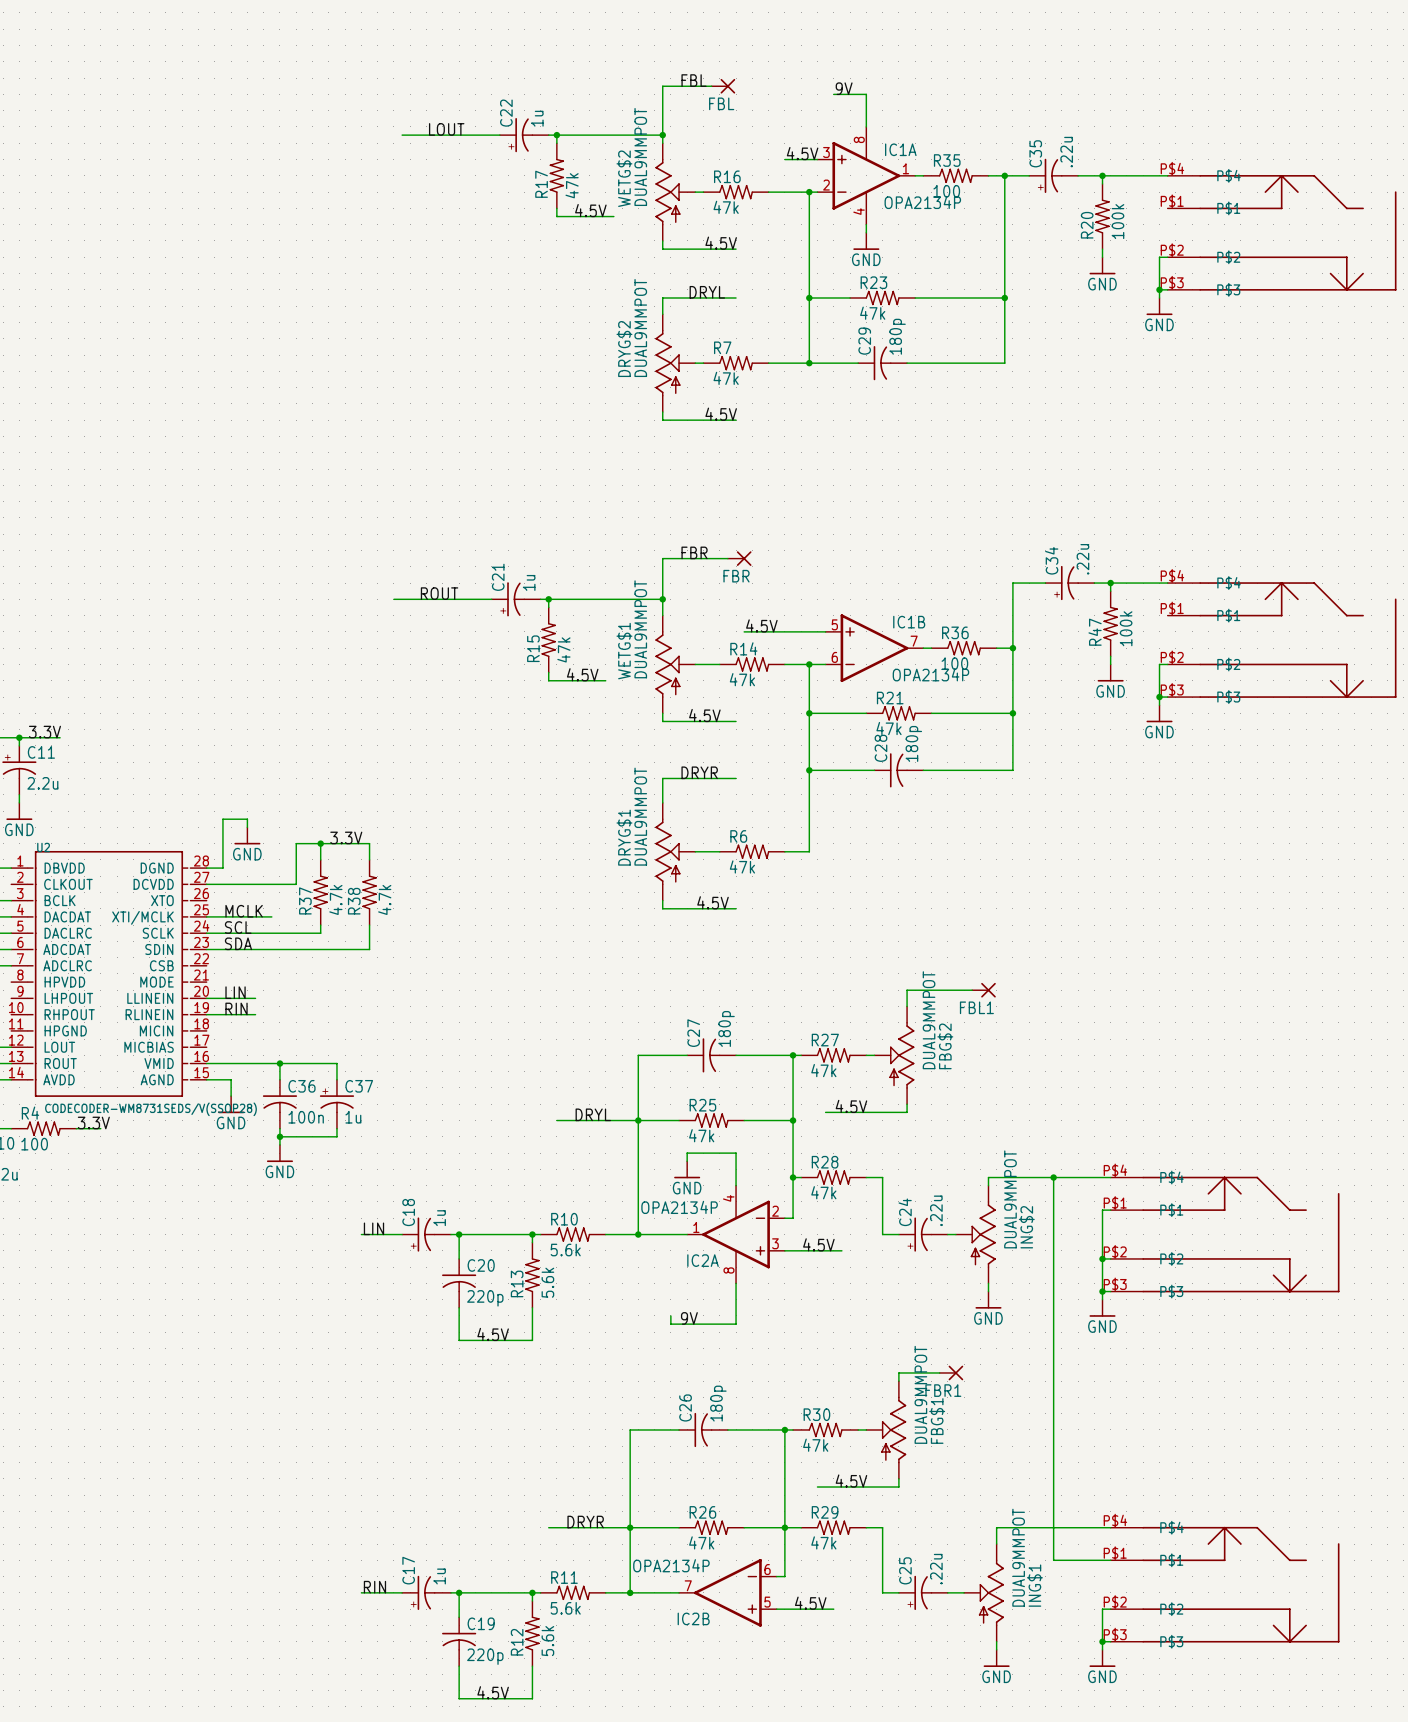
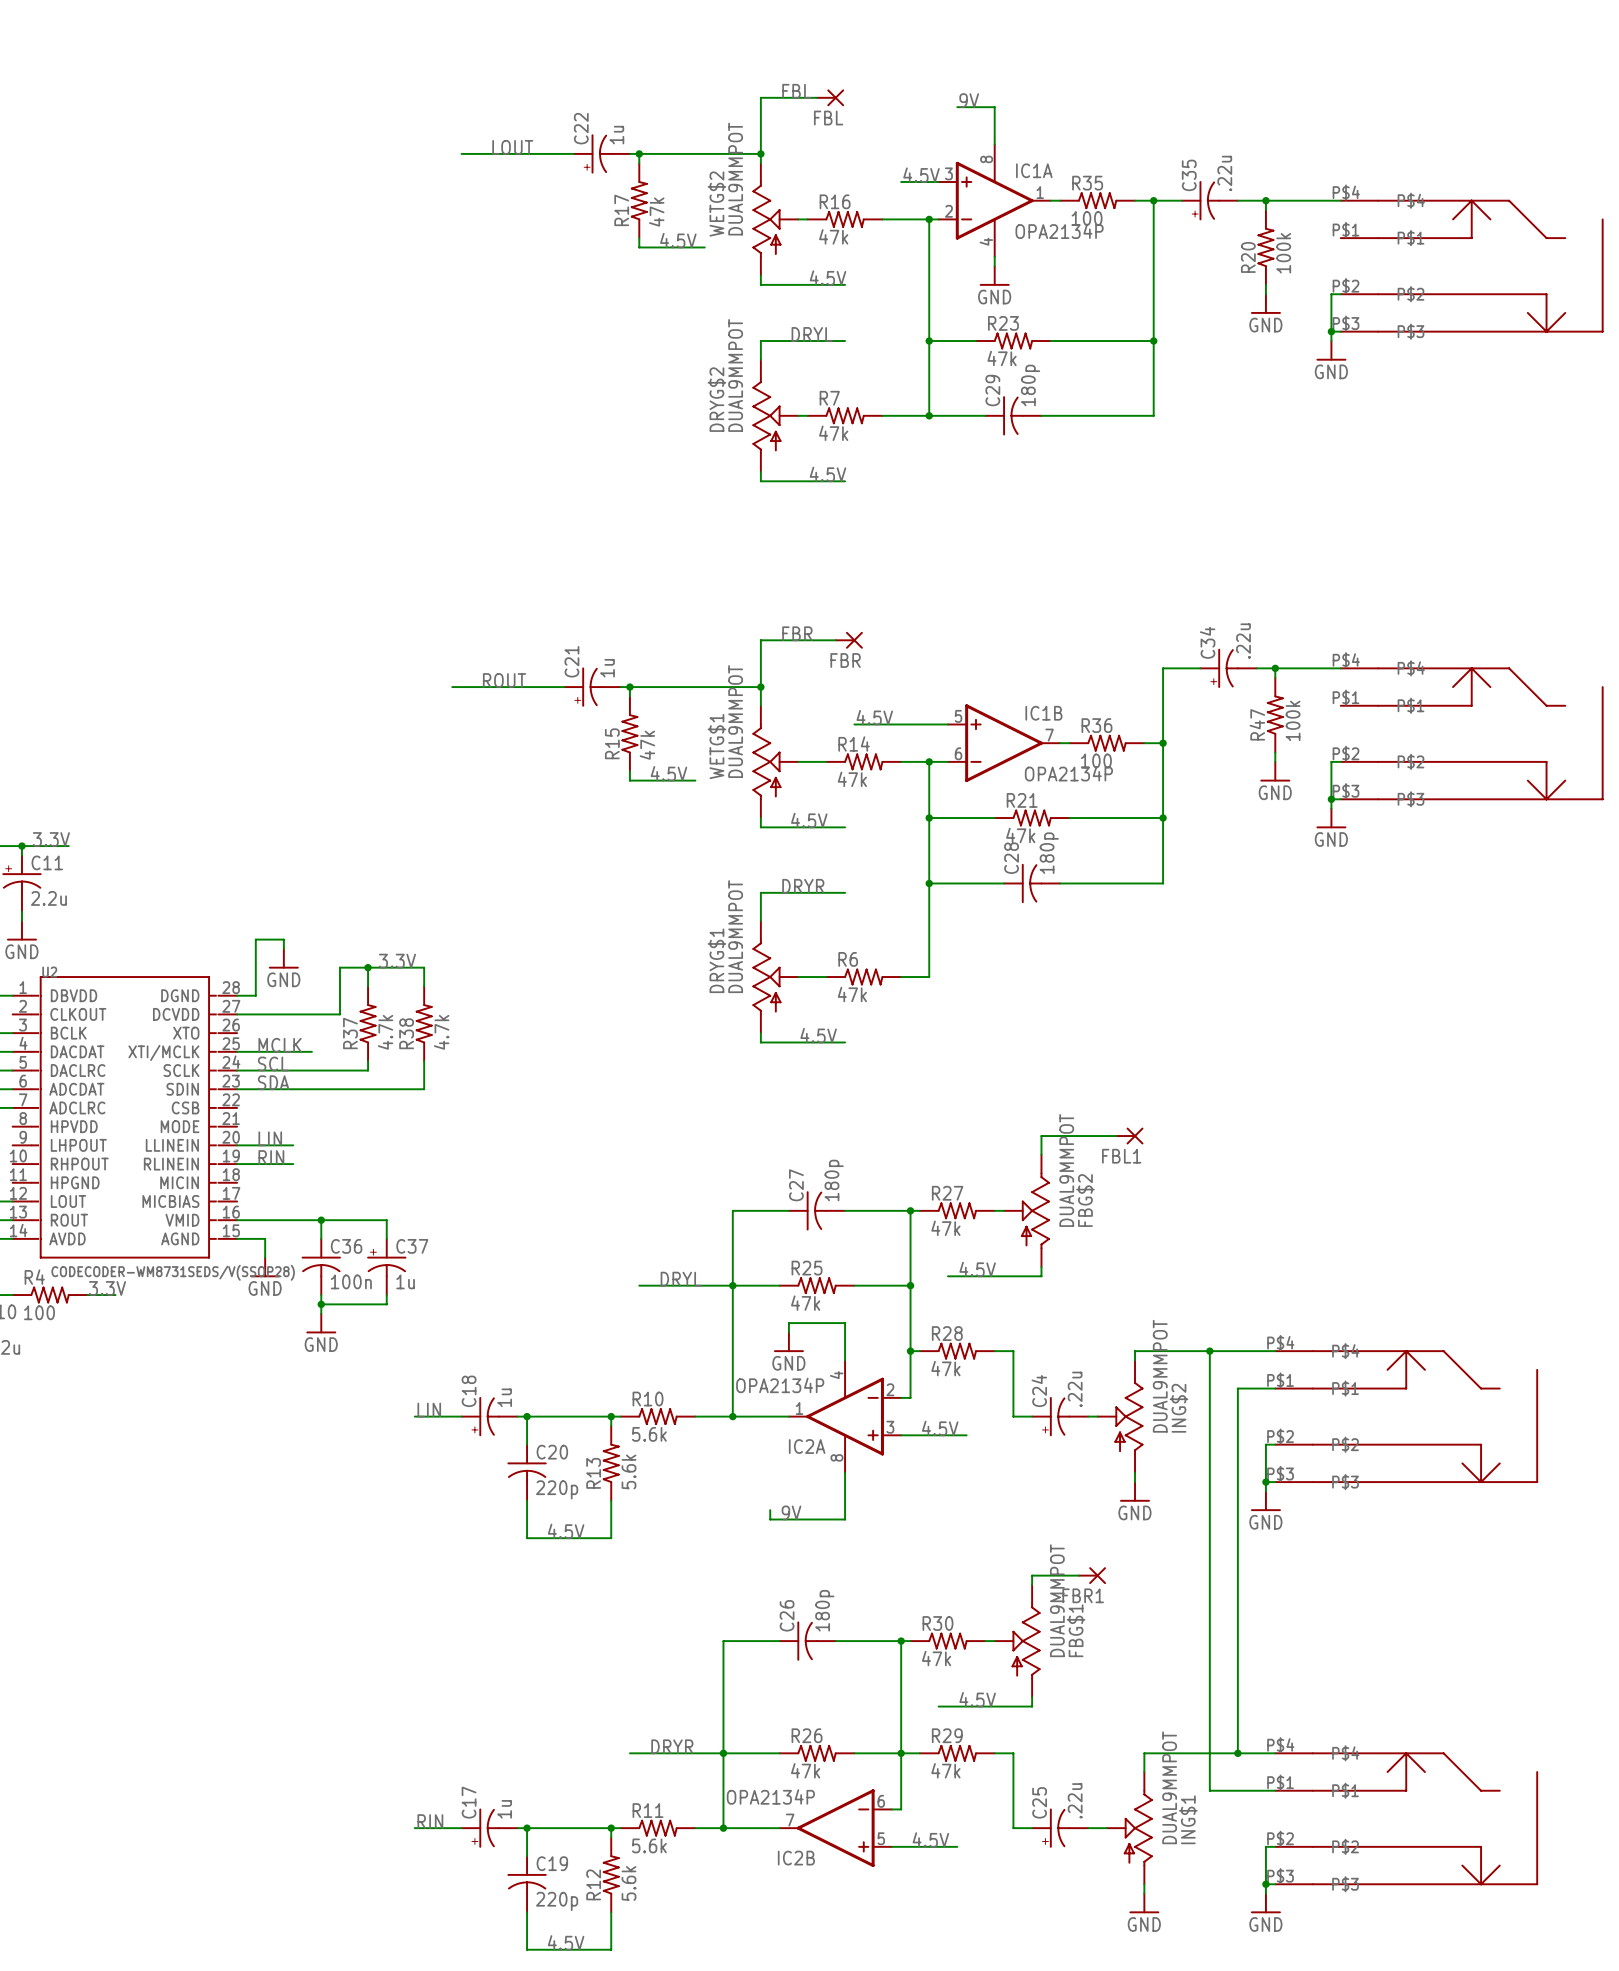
wire: (1102, 1210) (1102, 1258) -> (1265, 1388) (1237, 1388) (1237, 1753)
junction: (1102, 1258) -> none
junction: none -> (1237, 1753)

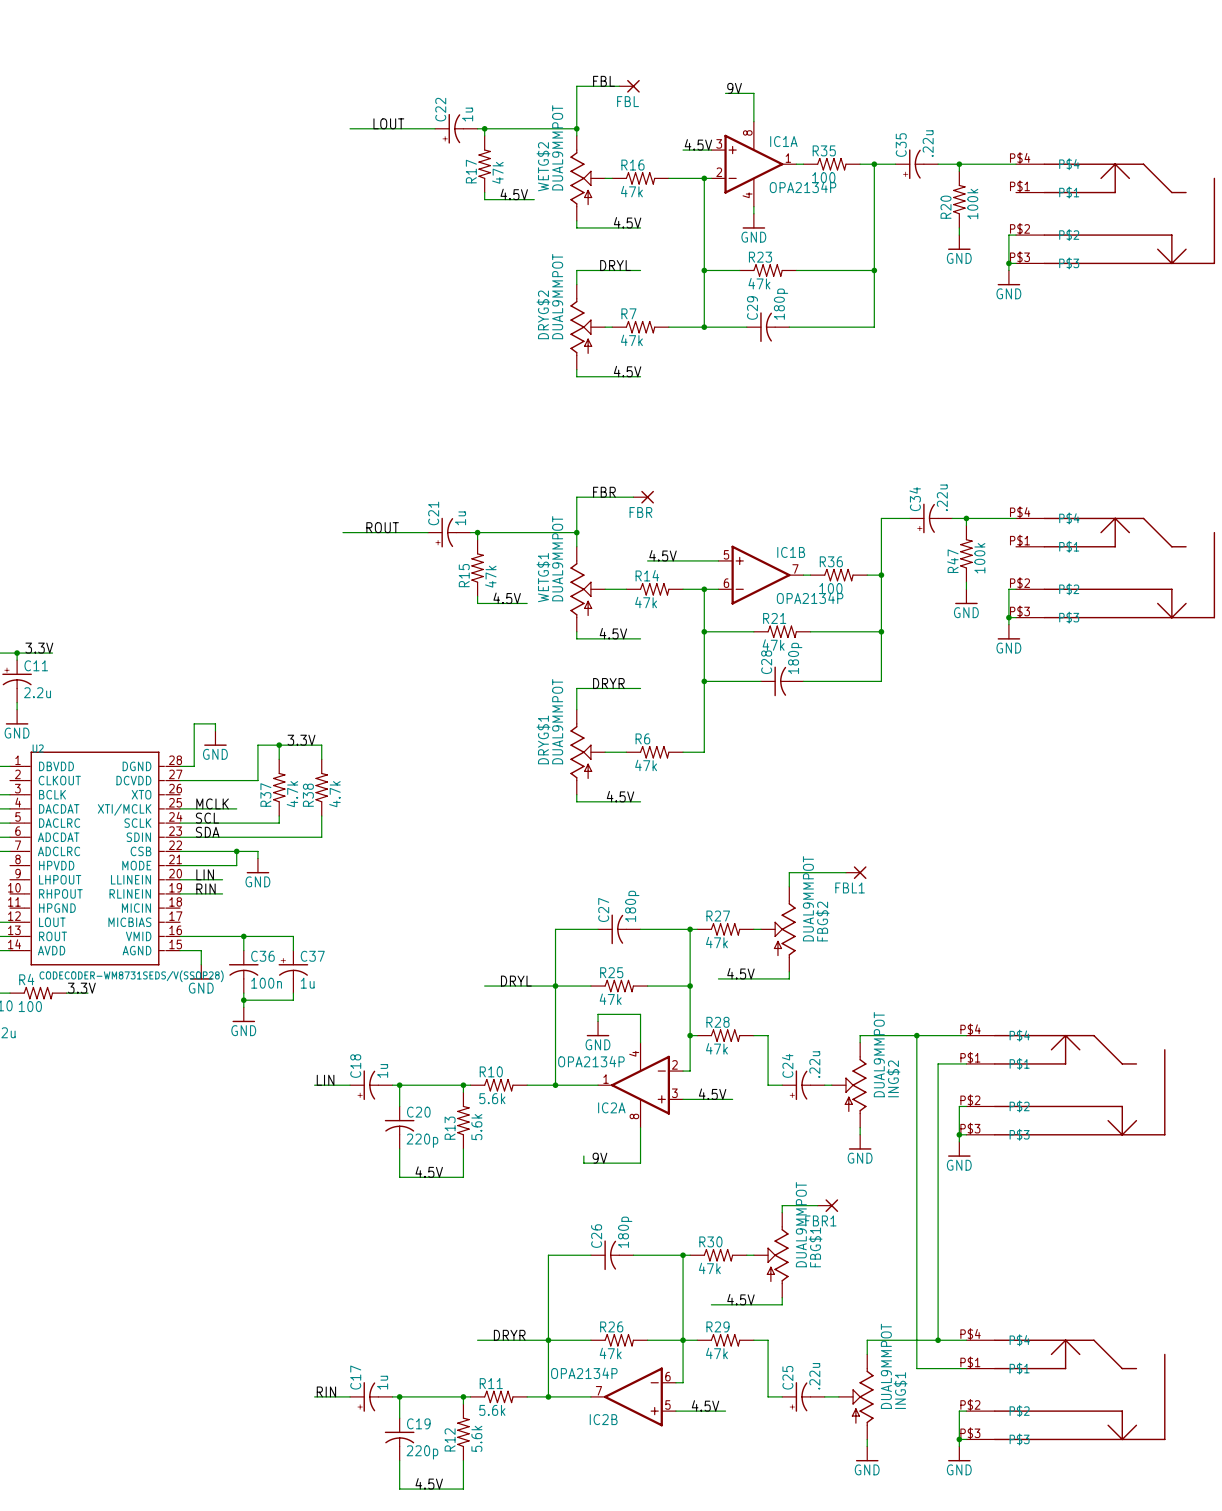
wire: none -> (180, 851) (257, 851) (257, 858)
wire: none -> (236, 851) (236, 865) (180, 865)
junction: none -> (236, 851)
power symbol: none -> GND (257, 865)

